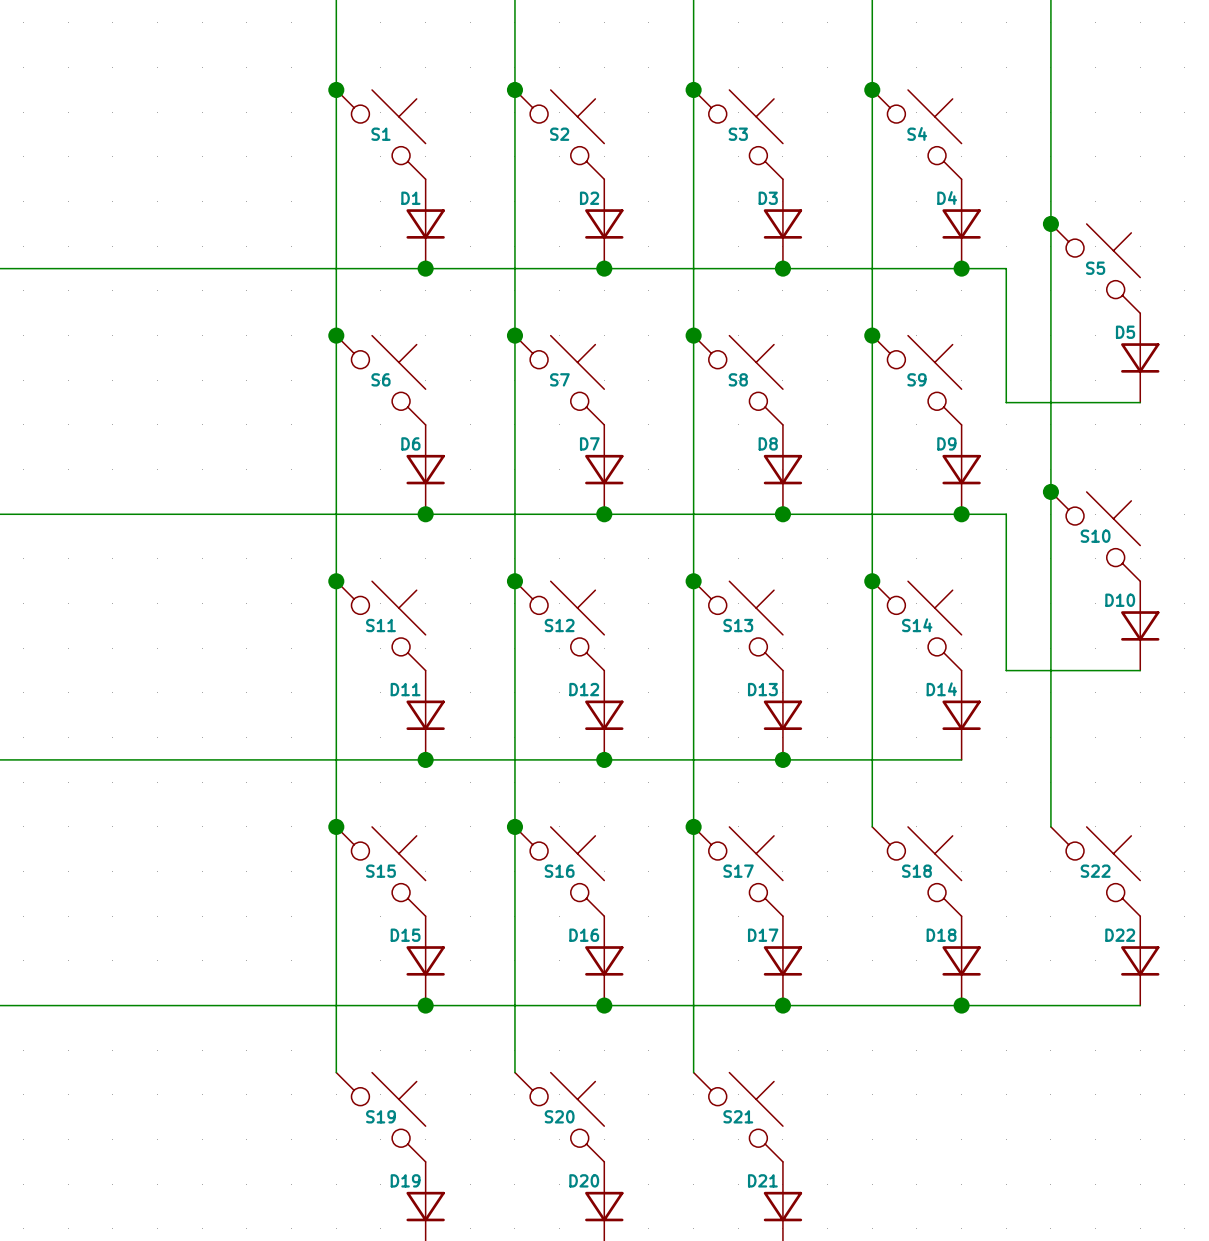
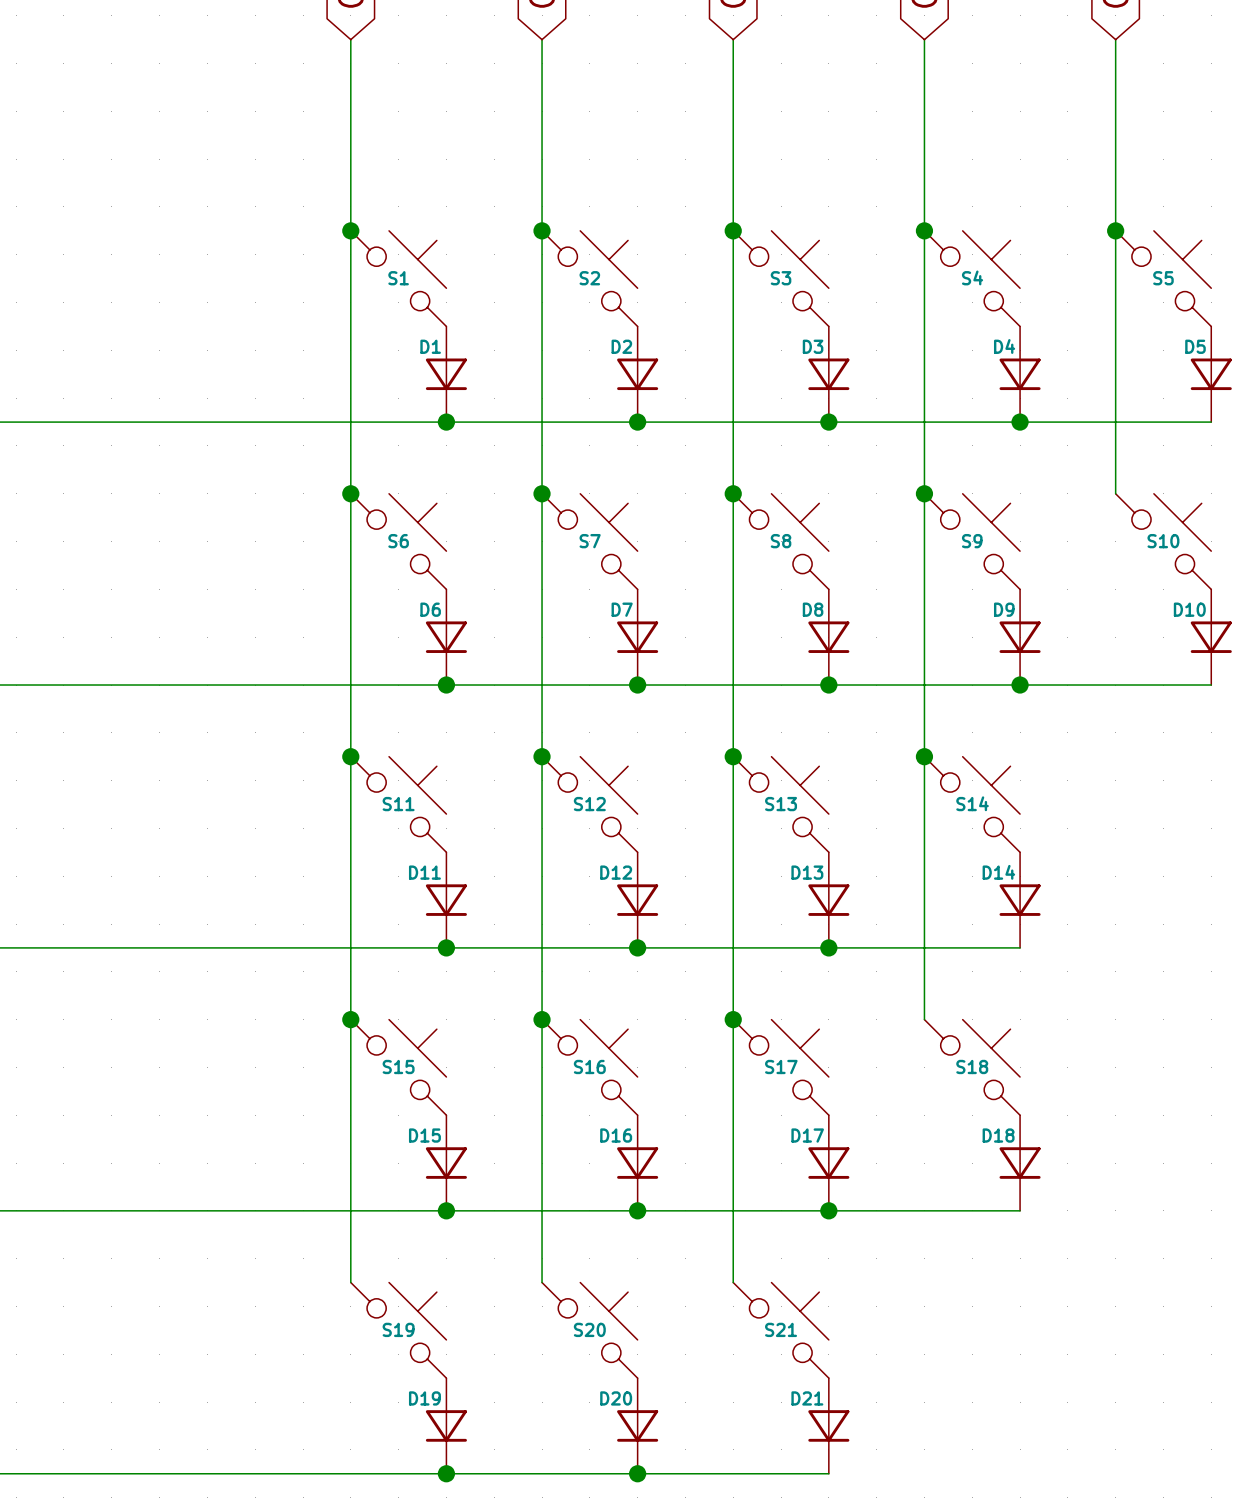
junction: none -> (1115, 230)
junction: (1050, 223) -> none
wire: (1006, 268) (1006, 402) (1140, 402) -> (1067, 422) (1211, 422)
S5 position: (1095, 268) -> (1163, 278)
wire: (1050, 335) (1050, 826) -> none
D5 position: (1140, 357) -> (1211, 374)
junction: (1050, 491) -> none
wire: (1006, 514) (1006, 670) (1140, 670) -> (1067, 685) (1211, 685)
S10 position: (1095, 536) -> (1163, 541)
D10 position: (1140, 625) -> (1211, 637)
S22: (1095, 871) -> none
D22: (1140, 960) -> none
wire: (961, 1005) (1140, 1005) -> none
junction: (961, 1005) -> none

